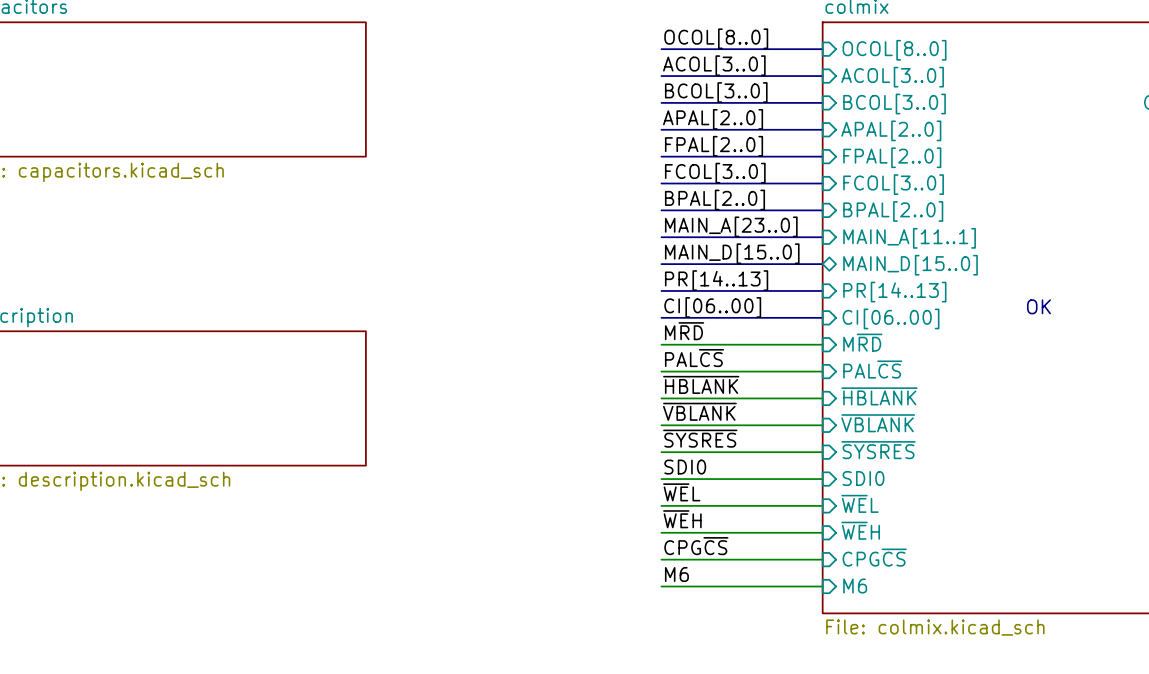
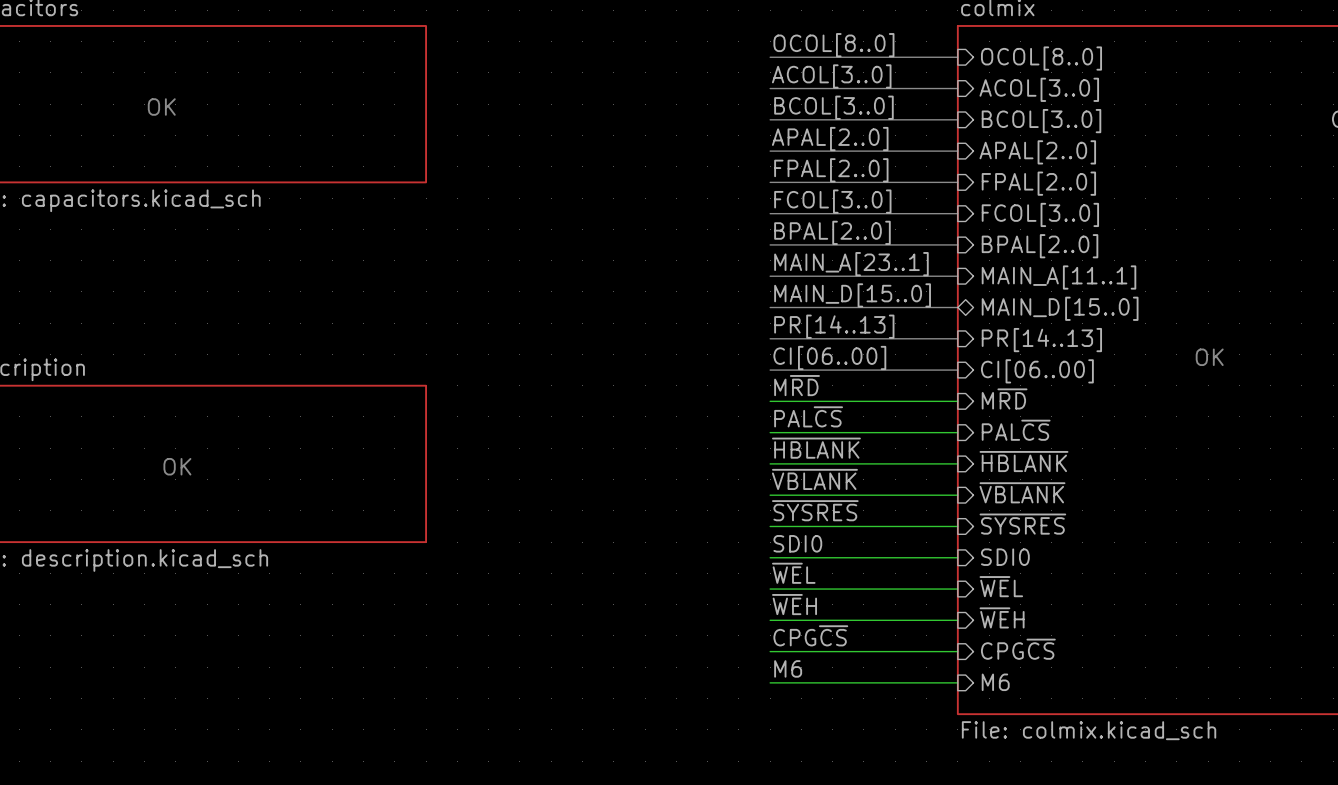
text: none -> OK (161, 107)
label: MAIN_A[23..0] (731, 226) -> MAIN_A[23..1] (851, 264)
text: none -> OK (177, 466)

